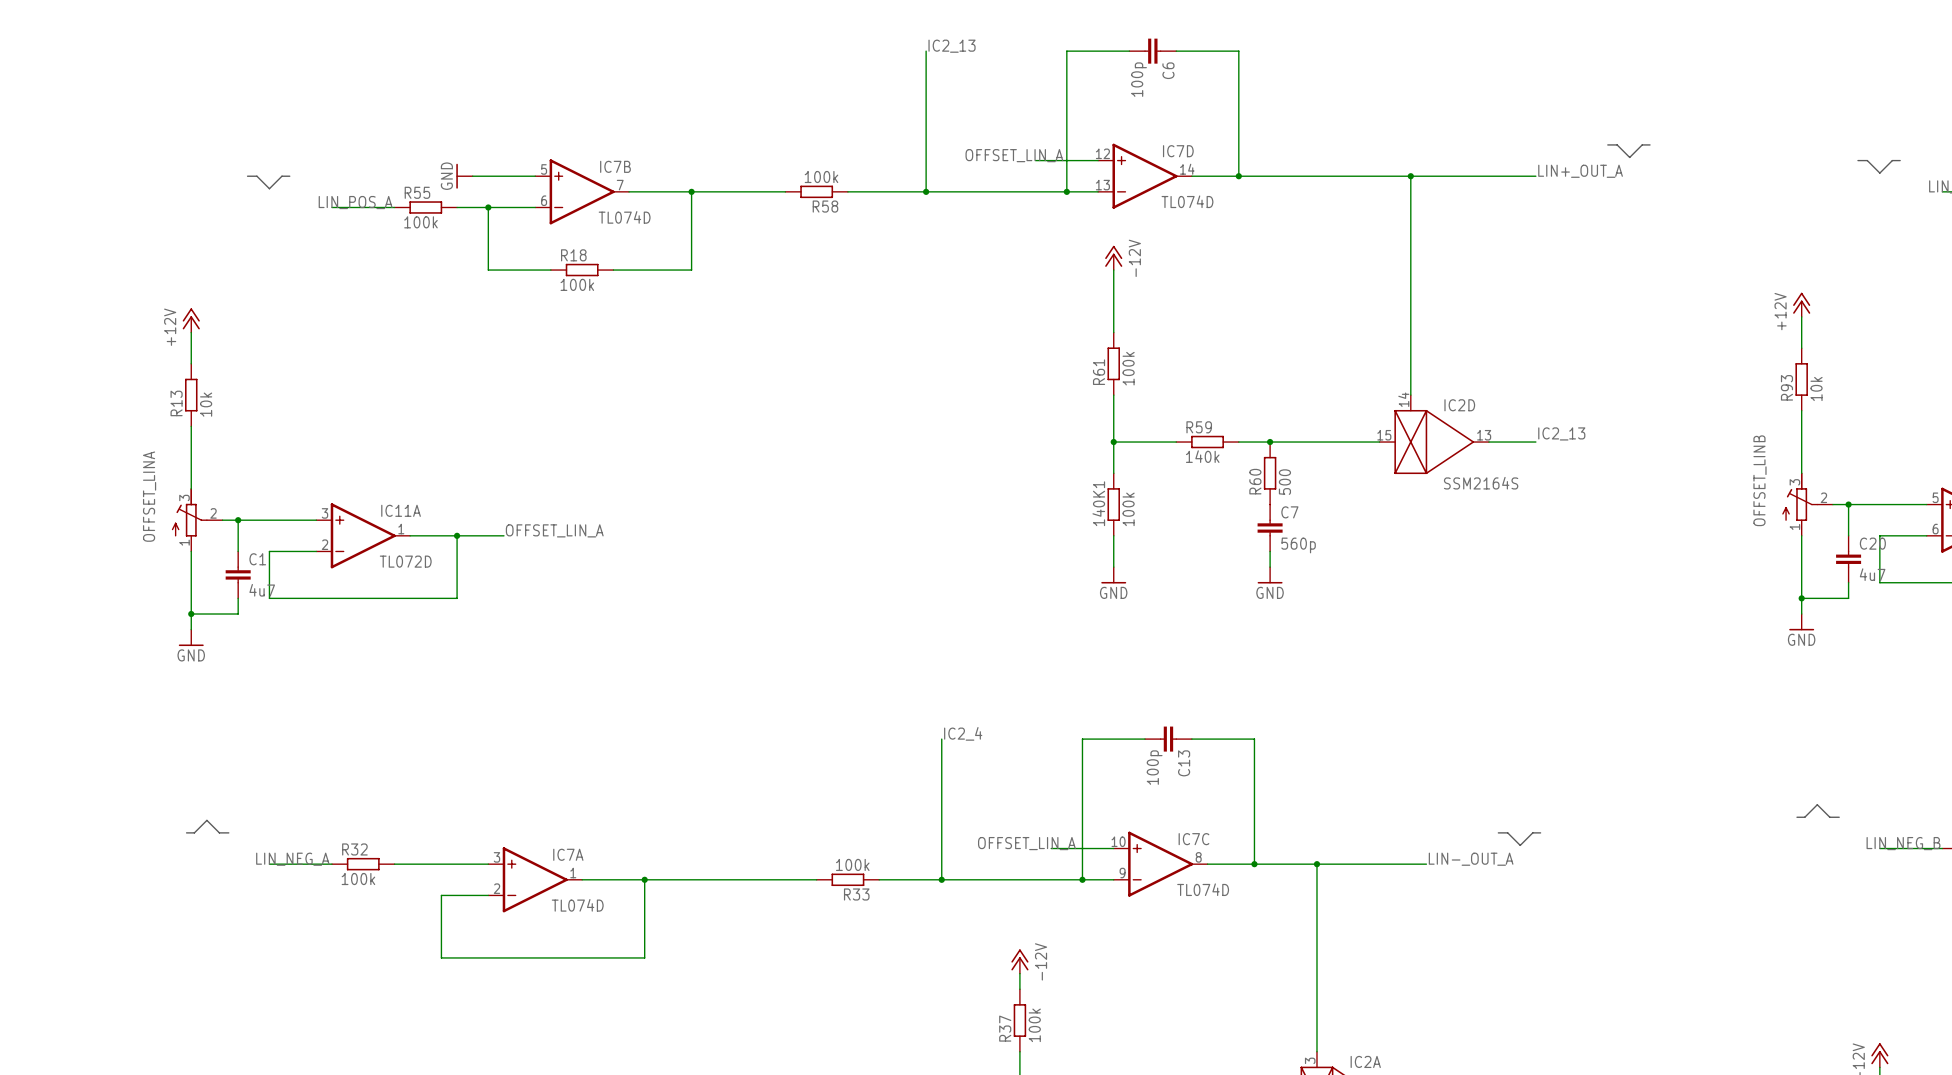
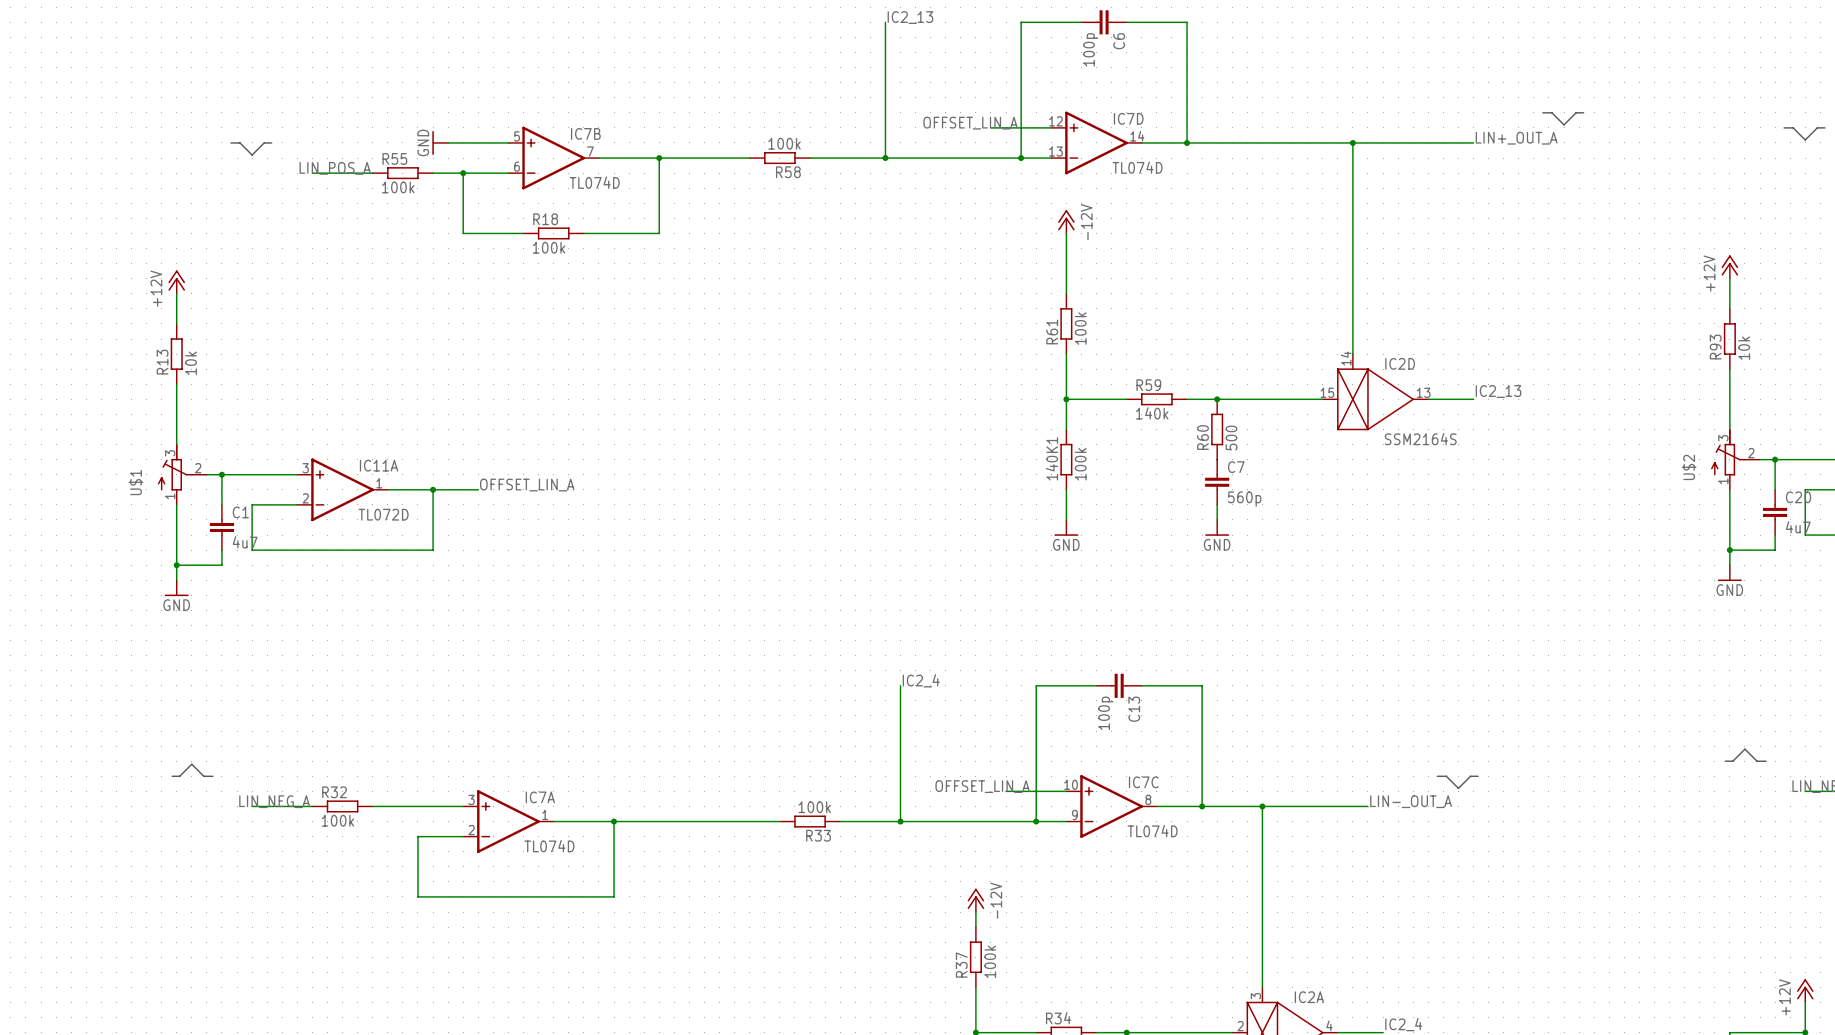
OFFSET_LINB name: OFFSET_LINB (1759, 480) -> U$2 (1689, 467)
OFFSET_LINA name: OFFSET_LINA (149, 496) -> U$1 (136, 482)

